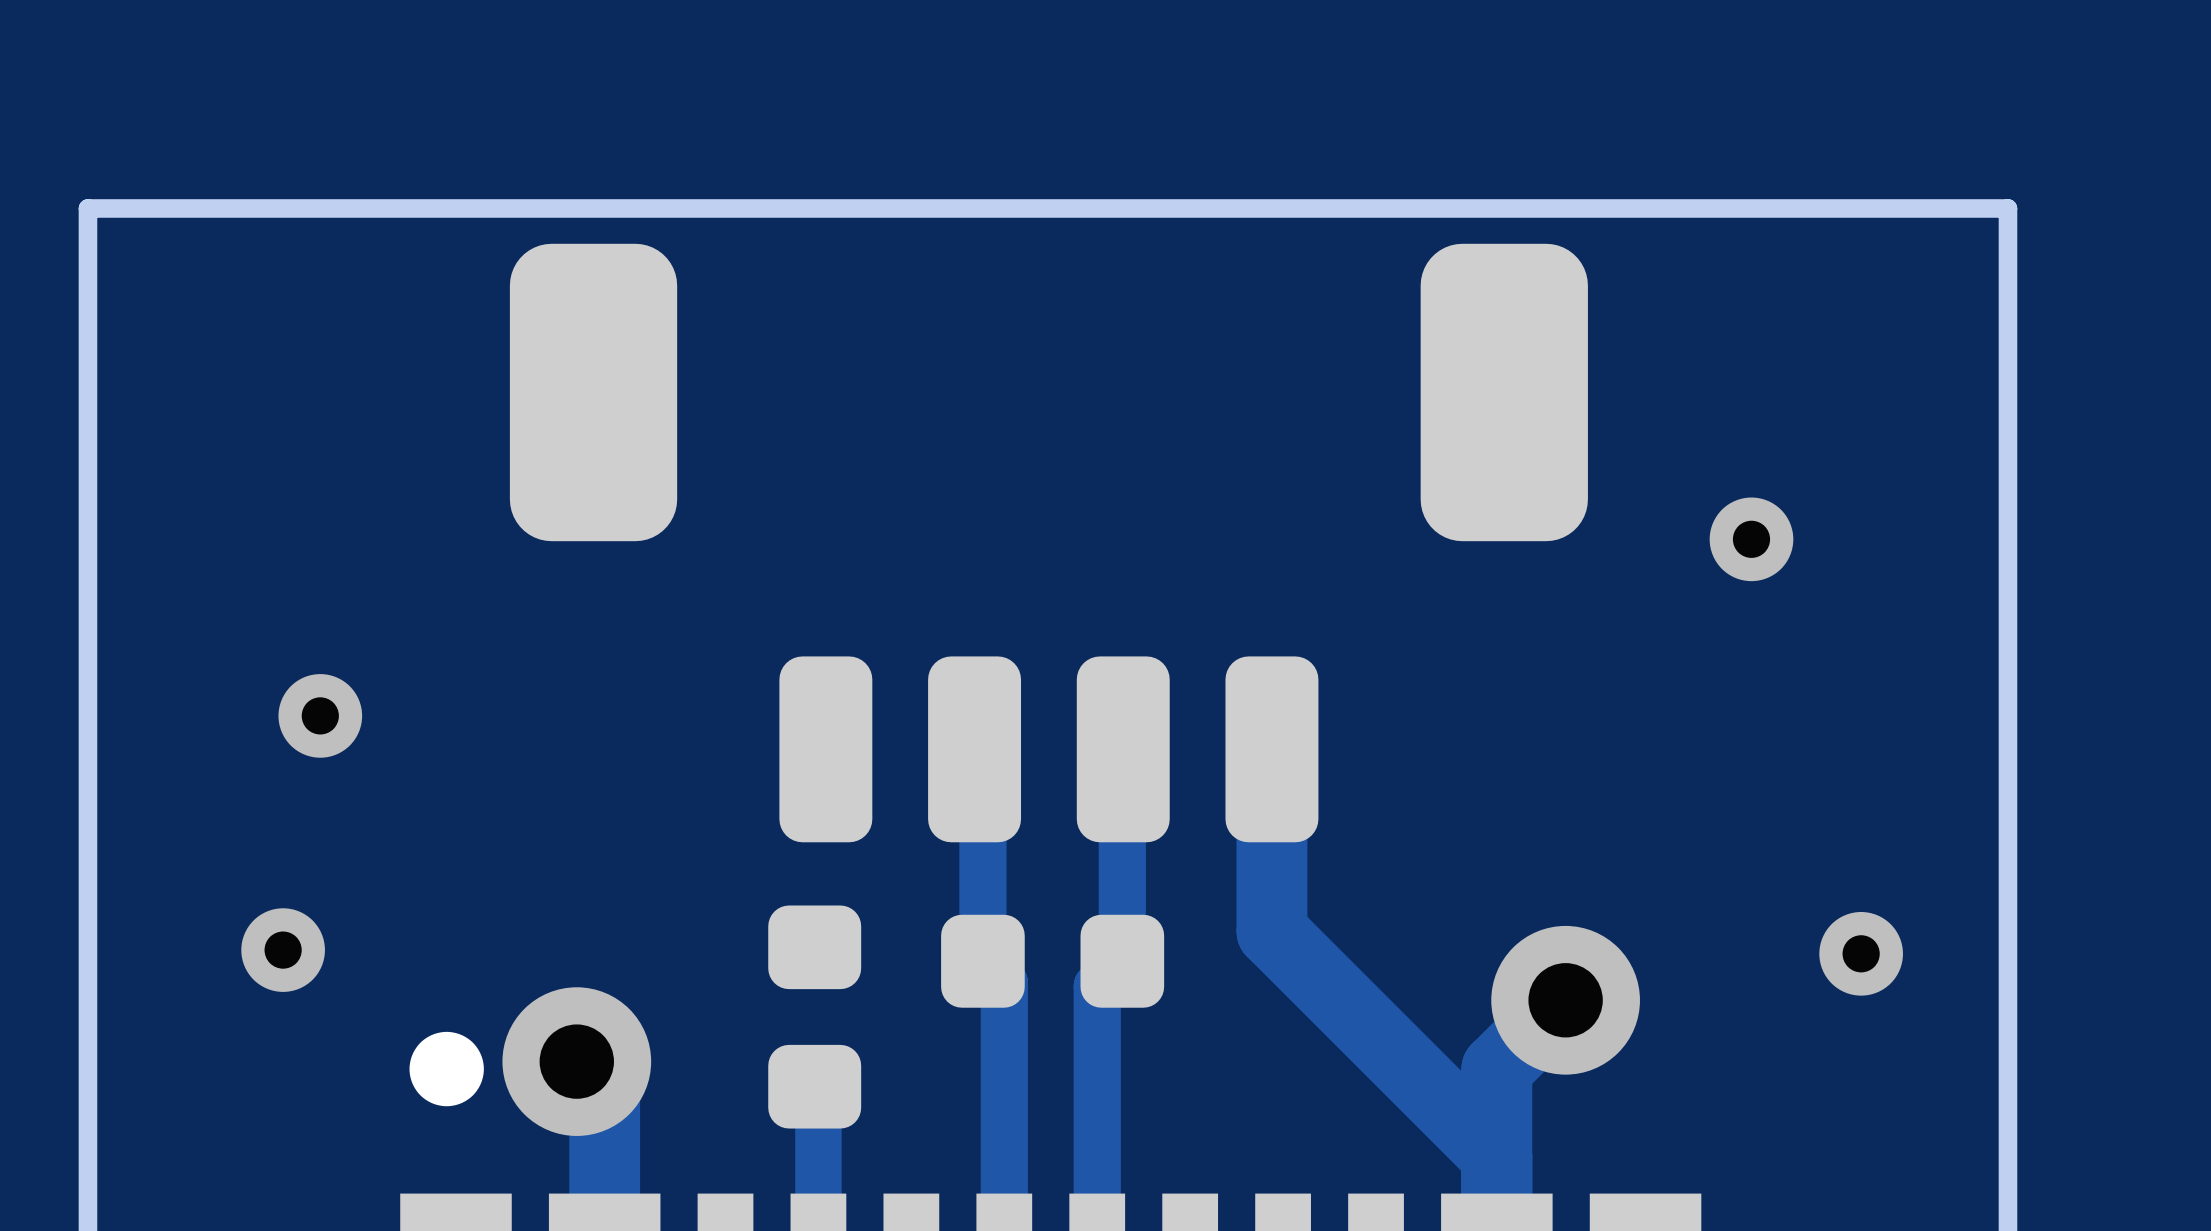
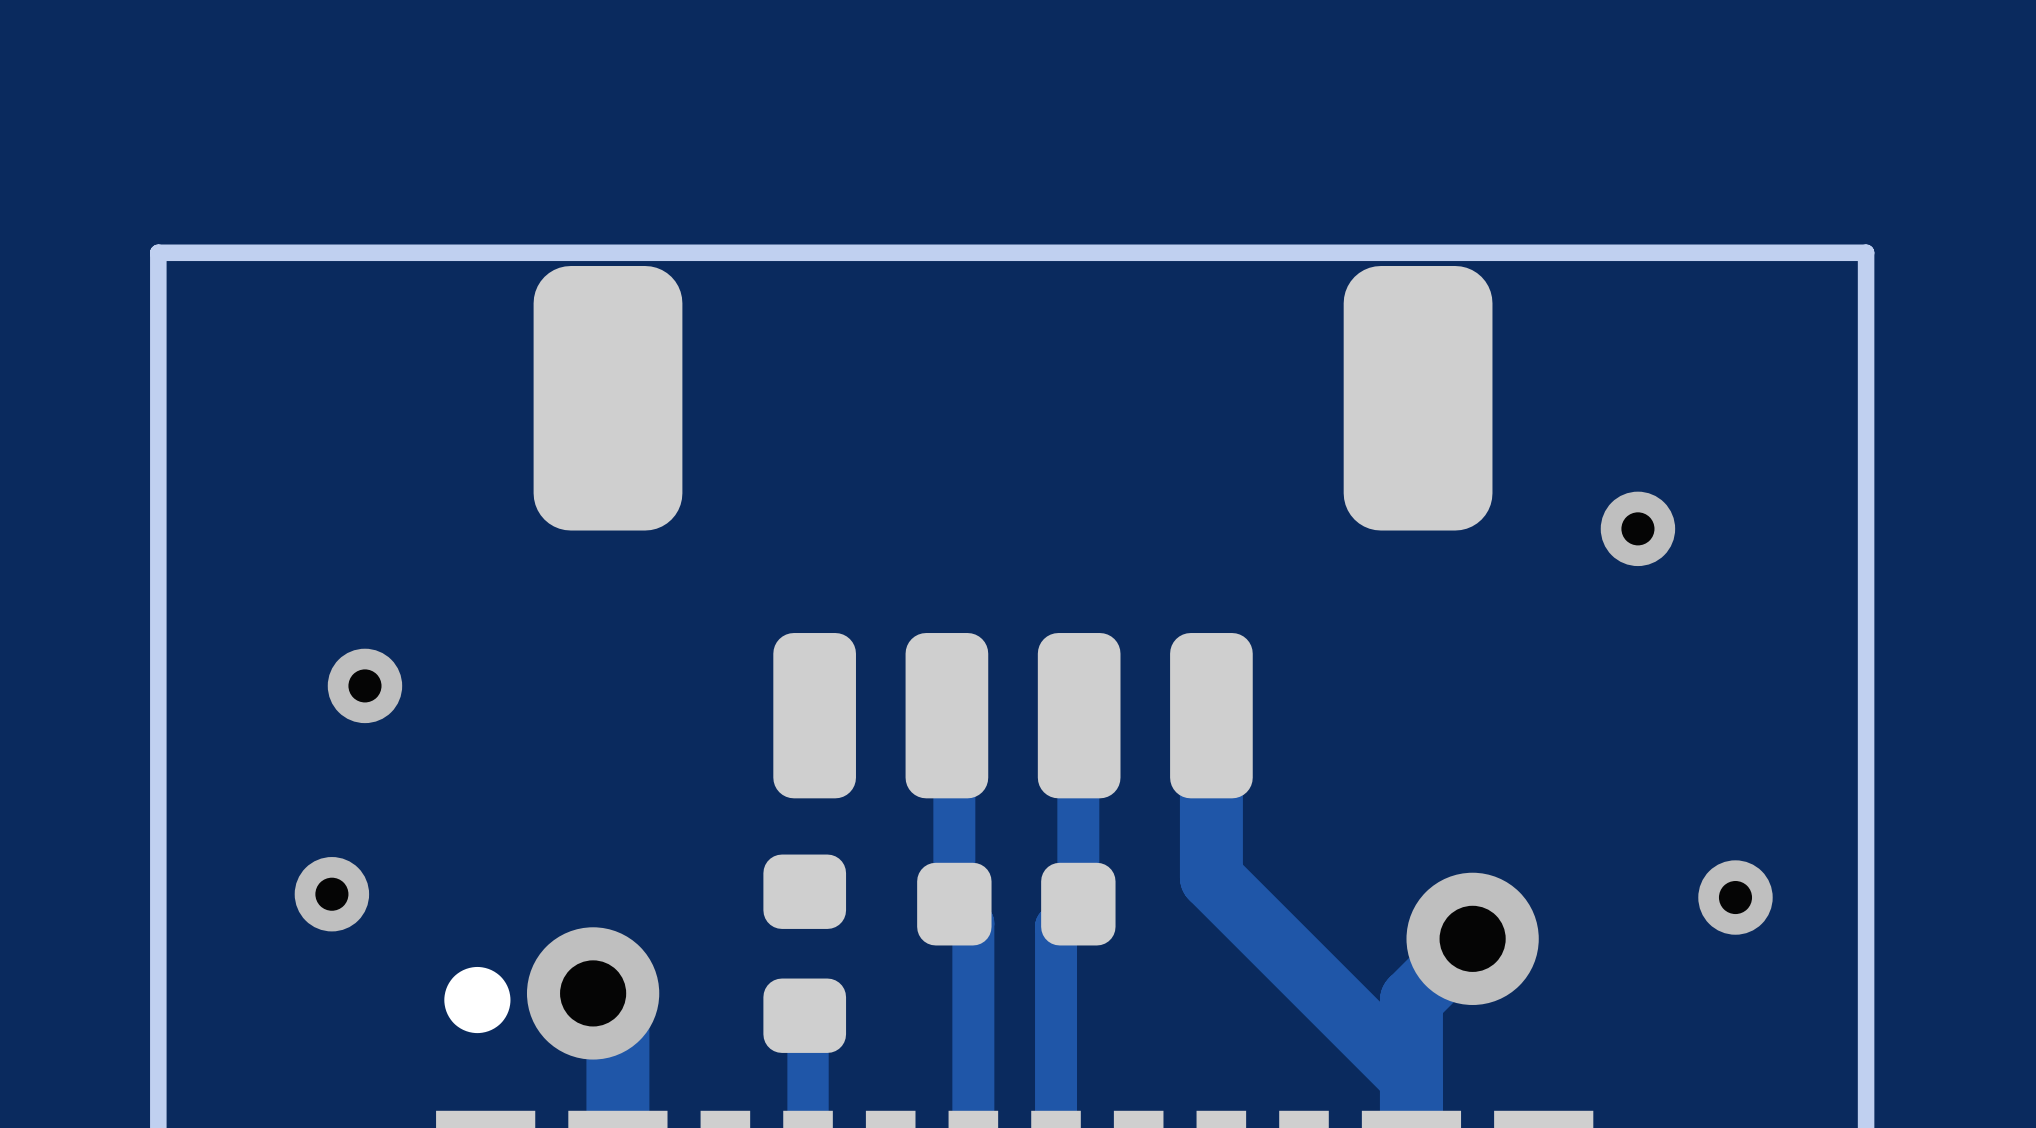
board edge: (87, 228) (87, 208) (2007, 208) (2007, 228) -> (158, 252) (1866, 252)

